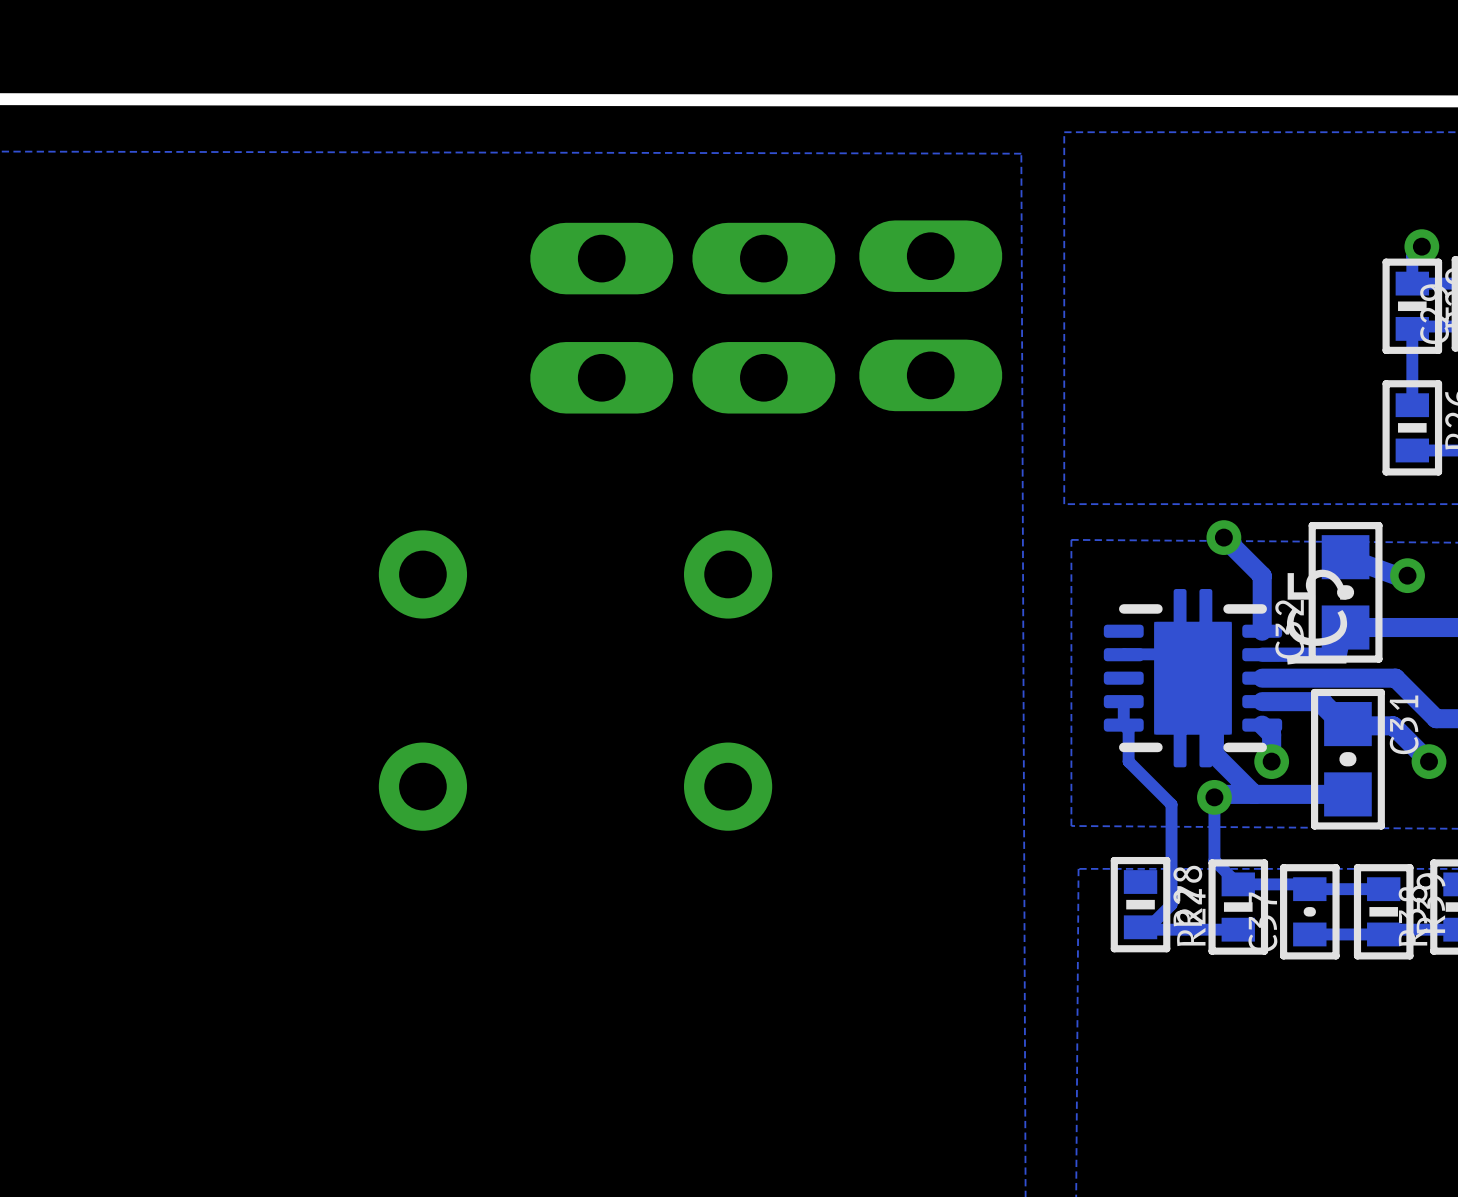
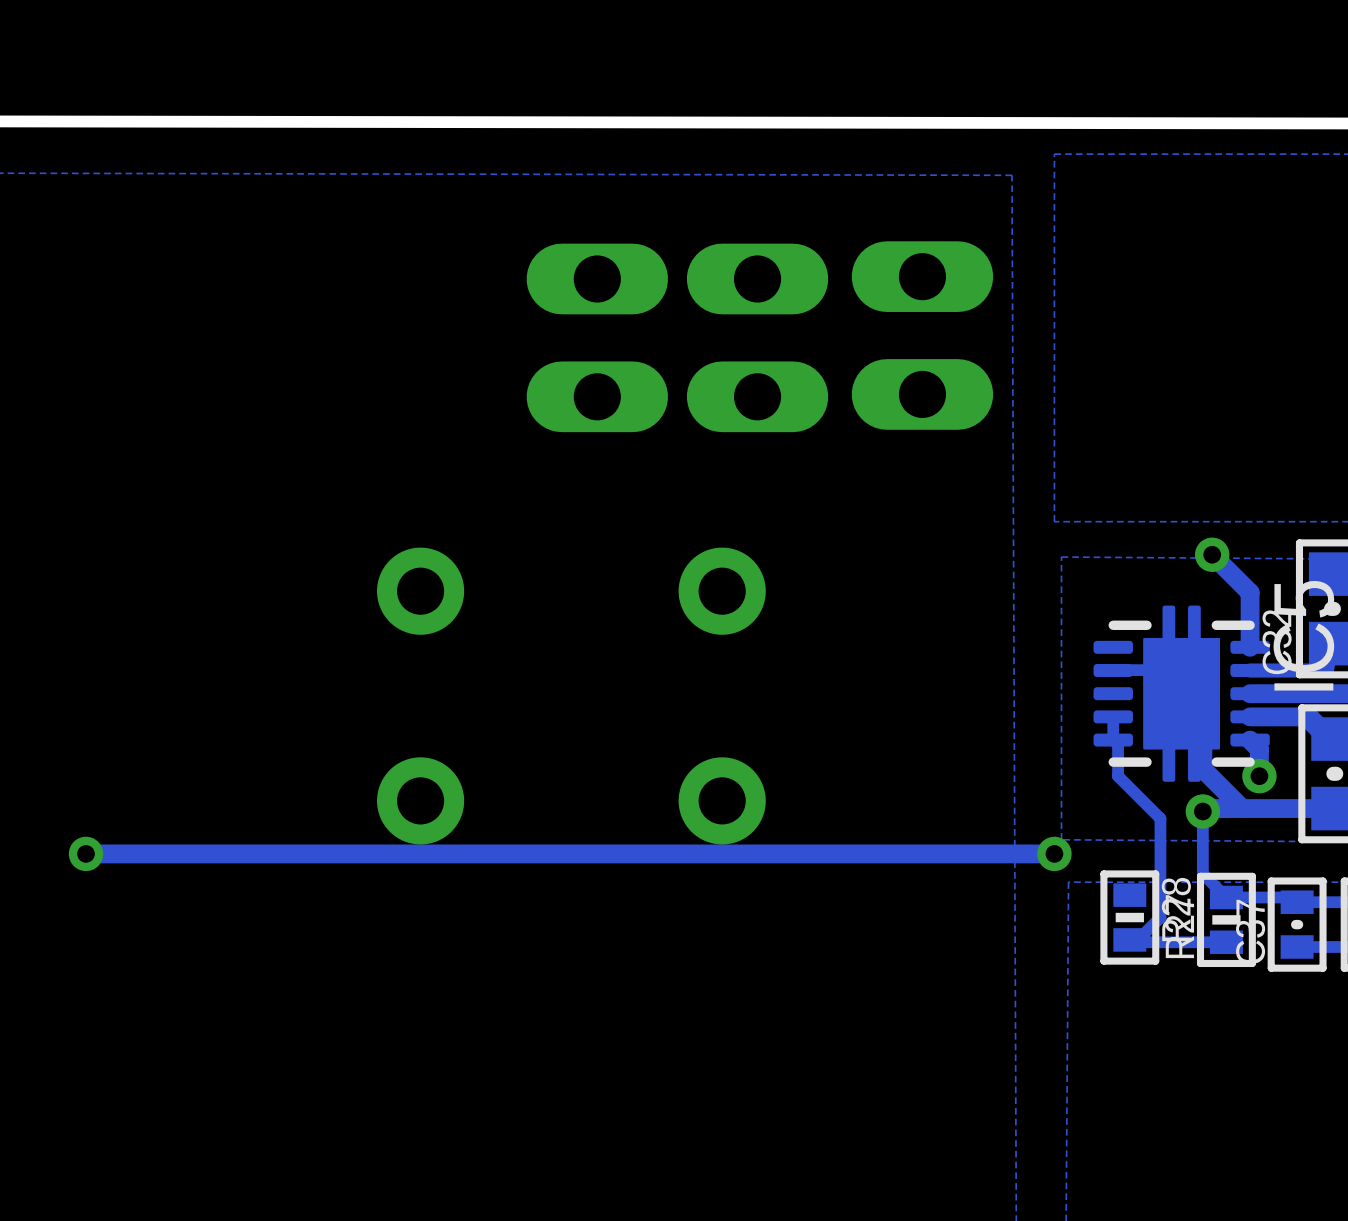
via: none -> (86, 853)
track: none -> (1054, 853) (86, 853)
via: none -> (1054, 853)

